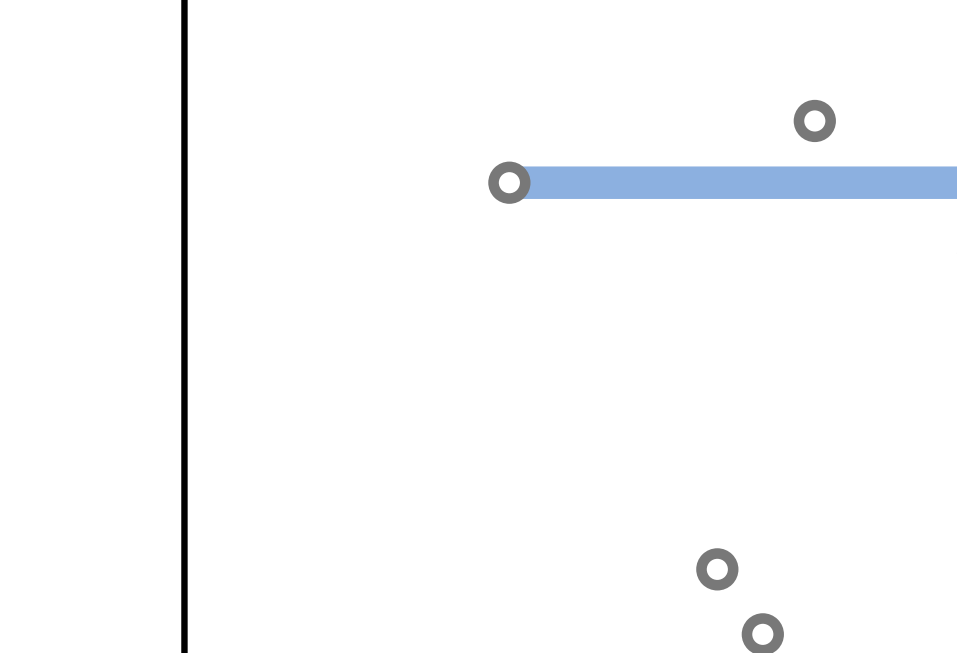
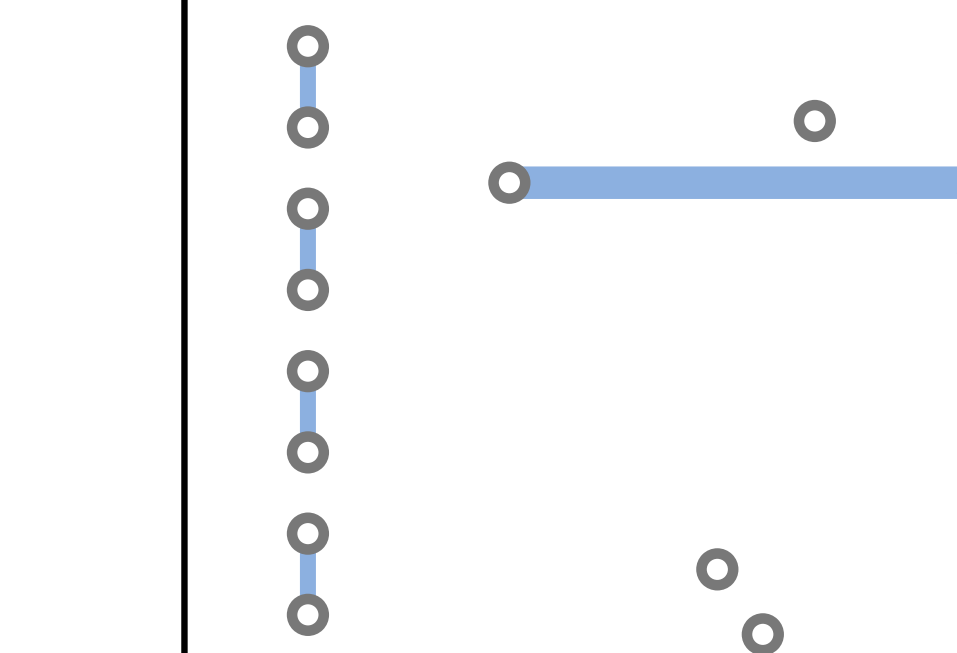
track: none -> (307, 46) (307, 127)
via: none -> (307, 46)
via: none -> (307, 127)
track: none -> (307, 208) (307, 289)
via: none -> (307, 208)
via: none -> (307, 289)
track: none -> (307, 371) (307, 452)
via: none -> (307, 371)
via: none -> (307, 452)
track: none -> (307, 533) (307, 614)
via: none -> (307, 533)
via: none -> (307, 614)

